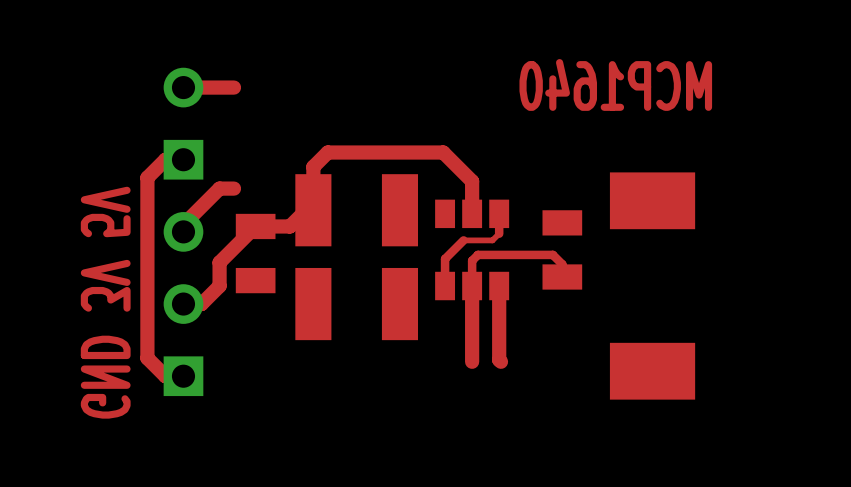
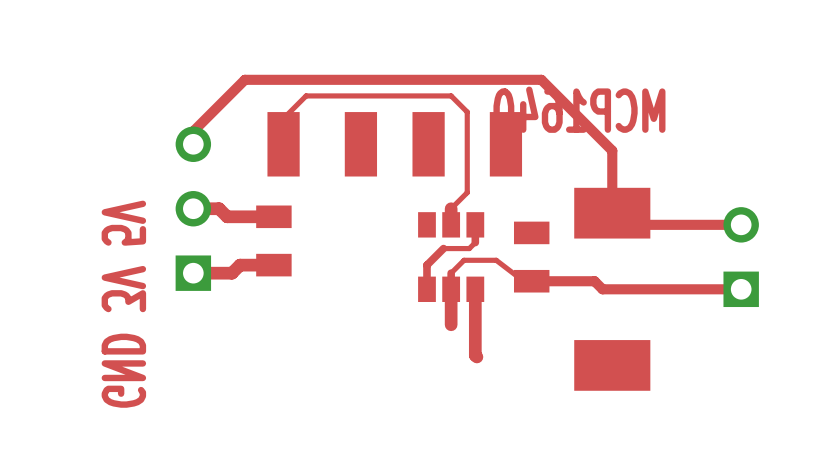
top track: (234, 87) (183, 87) -> none
top track: none -> (193, 144) (193, 131) (244, 79) (541, 79) (612, 150) (612, 213) (623, 224) (741, 224)
part position: (183, 123) -> (741, 257)
part: none -> (322, 144)
part: none -> (467, 144)
top track: (183, 159) (165, 159) (147, 177) (147, 358) (165, 376) (183, 376) -> none
top track: (234, 188) (219, 188) (183, 224) (183, 231) -> none
top track: none -> (193, 208) (219, 208) (227, 216) (273, 216)
top track: (472, 195) (472, 181) (443, 152) (327, 152) (313, 166) (313, 210) (306, 210) (289, 226) (255, 226) (219, 262) (219, 286) (201, 304) (183, 304) -> (451, 208) (467, 192) (467, 112) (451, 95) (306, 95) (283, 118) (283, 144)
part: (356, 210) -> none
part position: (255, 253) -> (273, 240)
top track: none -> (273, 265) (240, 265) (232, 273) (193, 273)
top track: (472, 267) (472, 260) (477, 254) (552, 254) (562, 264) (562, 276) -> (451, 273) (464, 260) (496, 260) (523, 281) (594, 281) (602, 289) (741, 289)
part position: (183, 304) -> (193, 208)
part: (356, 304) -> none
top track: (472, 325) (472, 361) -> none

